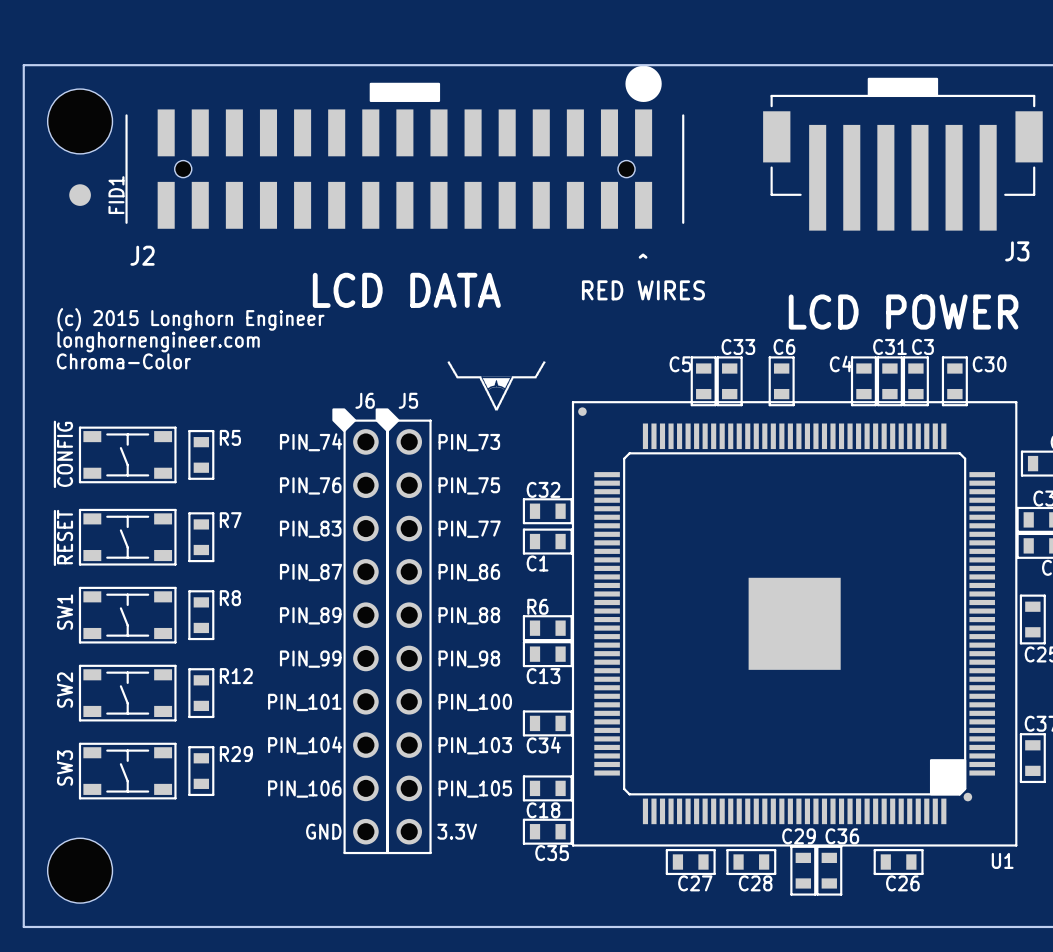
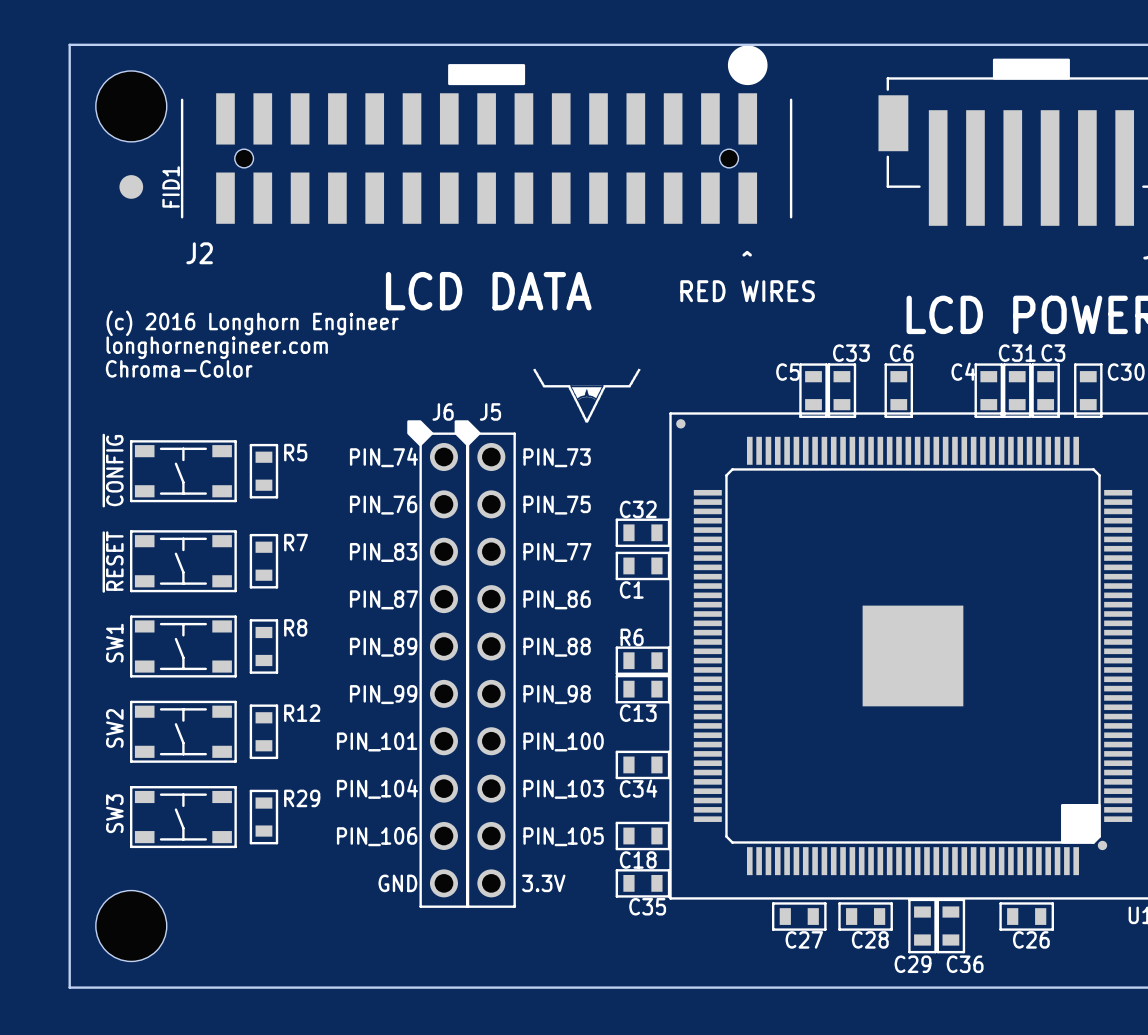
drawing shape: [56, 308, 325, 370] -> [105, 310, 399, 378]
C29 name position: C29 (799, 836) -> C29 (913, 964)
C36 name position: C36 (842, 836) -> C36 (965, 964)

